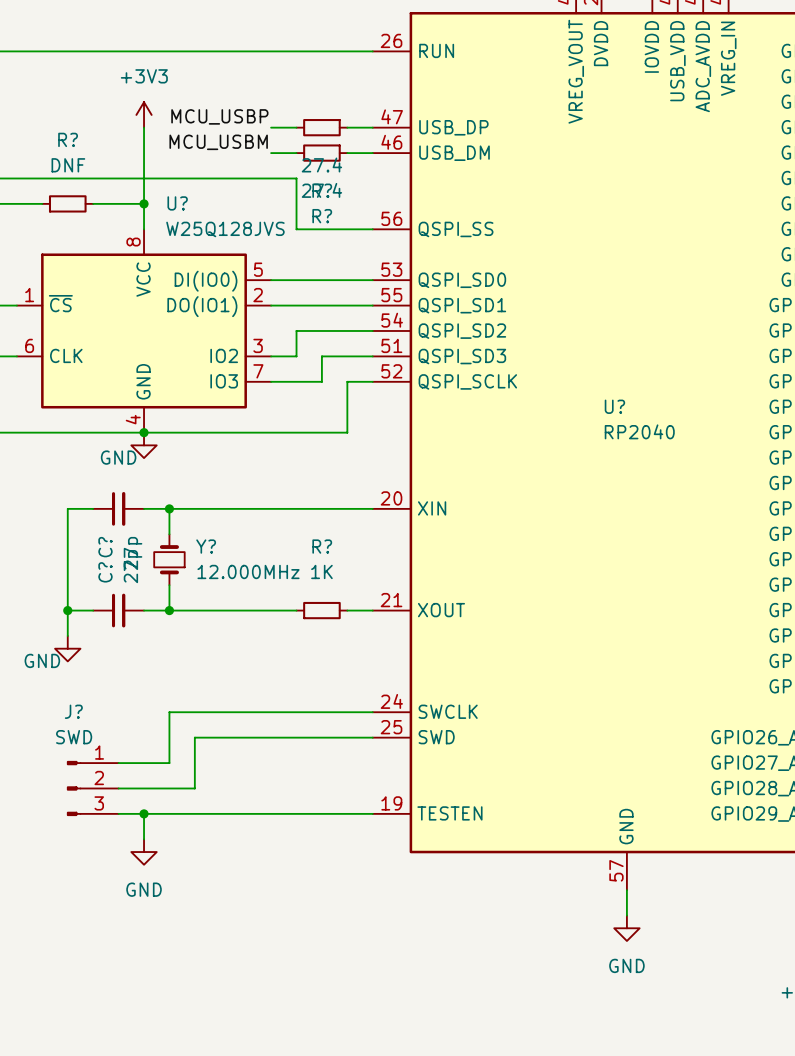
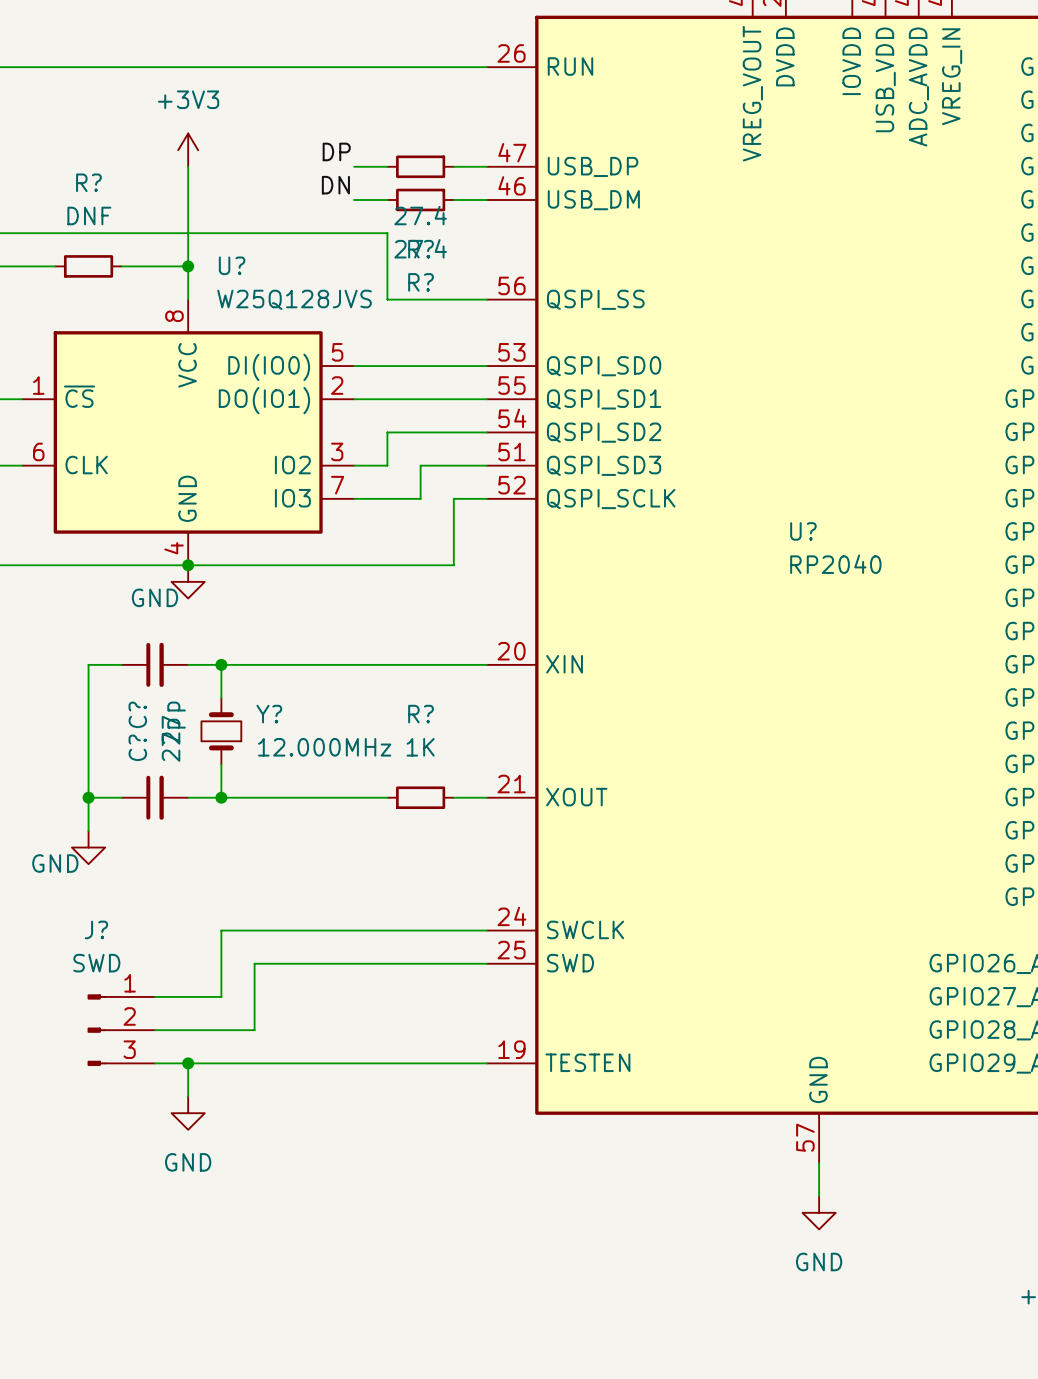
label: MCU_USBP (219, 116) -> DP (336, 151)
label: MCU_USBM (218, 142) -> DN (335, 185)

